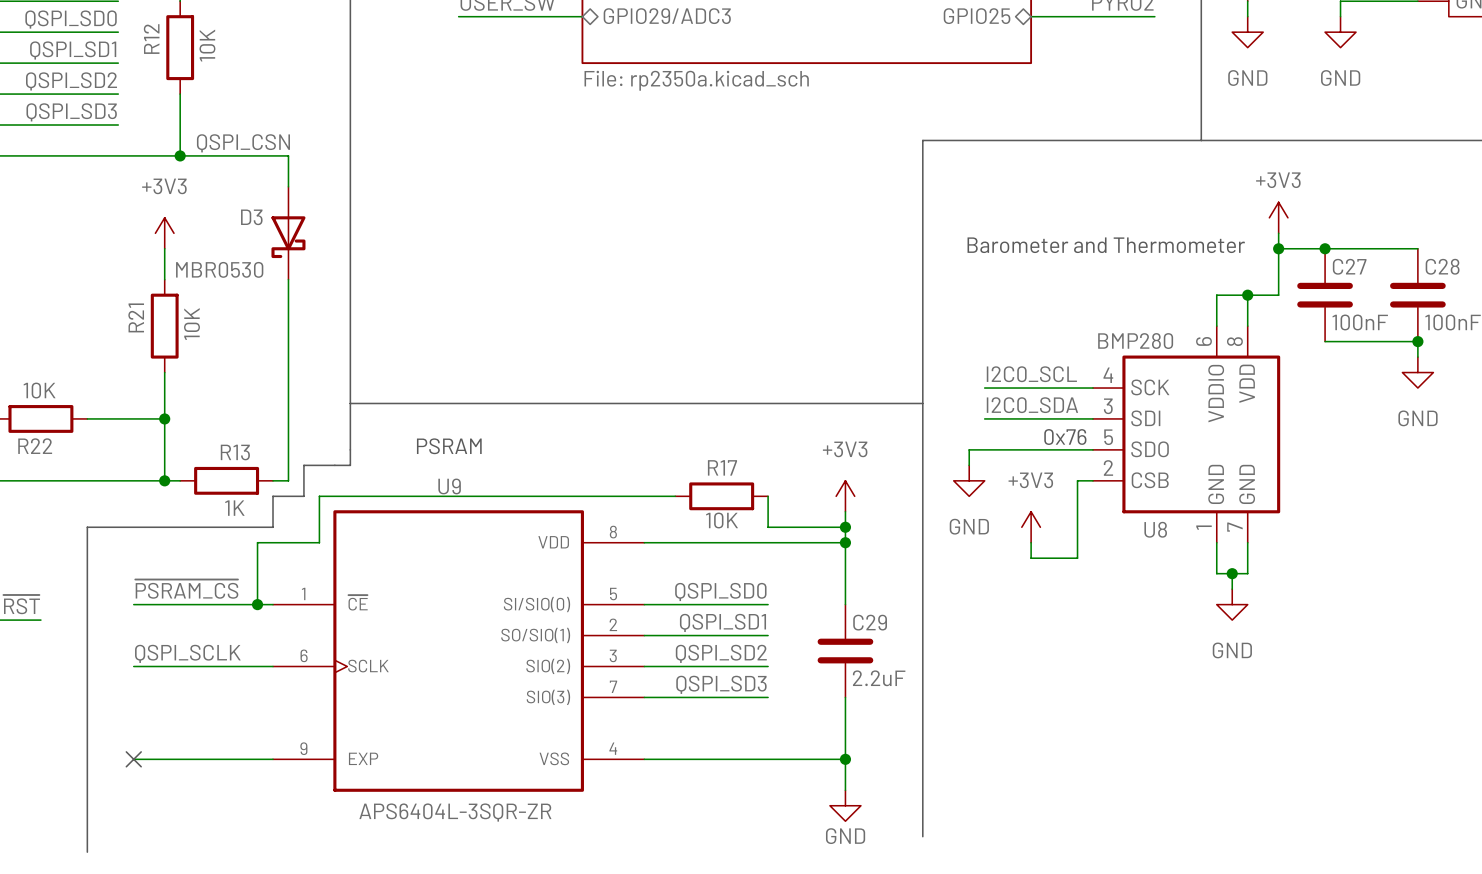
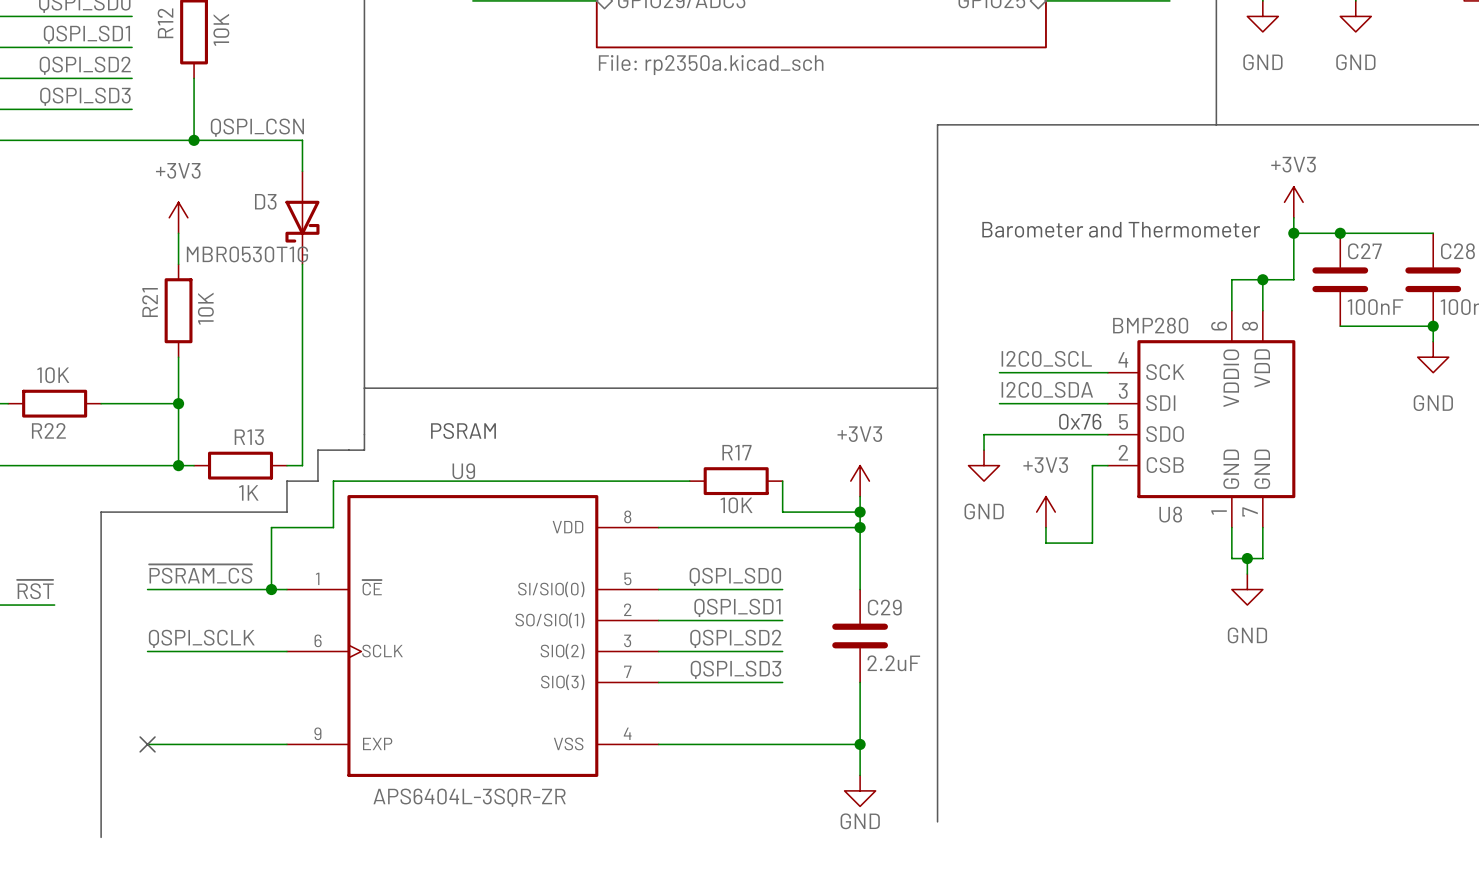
D3 value: MBR0530 (219, 269) -> MBR0530T1G (247, 254)

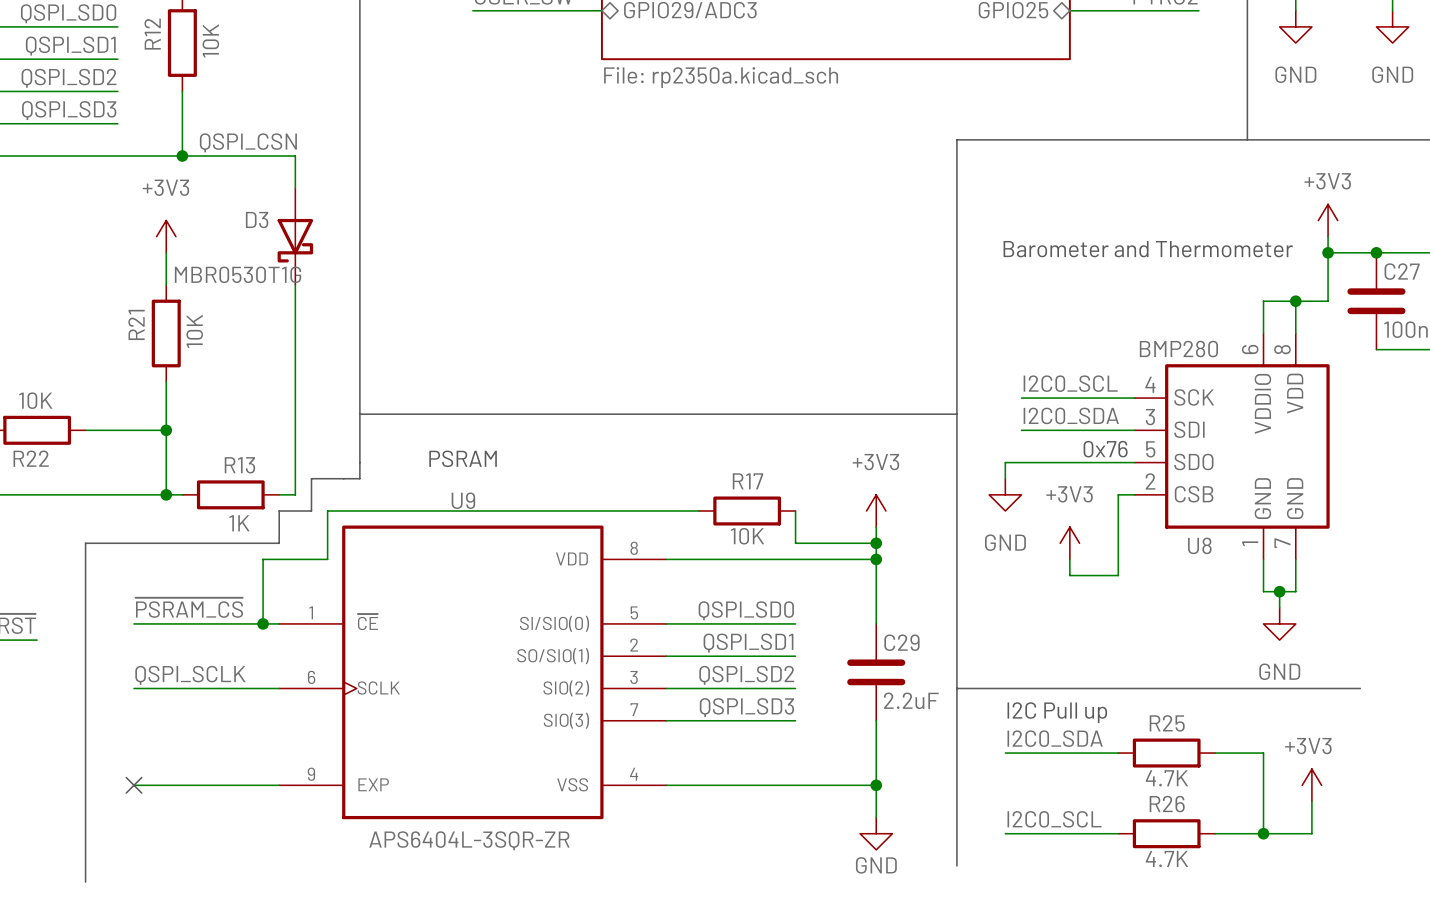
line: none -> (956, 688) (1360, 688)
text: none -> I2C Pull up (1057, 712)
label: none -> I2C0_SDA (1055, 738)
wire: none -> (1005, 753) (1118, 753)
R25: none -> 4.7K (1166, 753)
wire: none -> (1215, 753) (1263, 753) (1263, 833)
power symbol: none -> +3V3 (1311, 785)
wire: none -> (1311, 801) (1311, 833) (1215, 833)
label: none -> I2C0_SCL (1054, 819)
wire: none -> (1005, 833) (1118, 833)
R26: none -> 4.7K (1166, 833)
junction: none -> (1263, 833)

